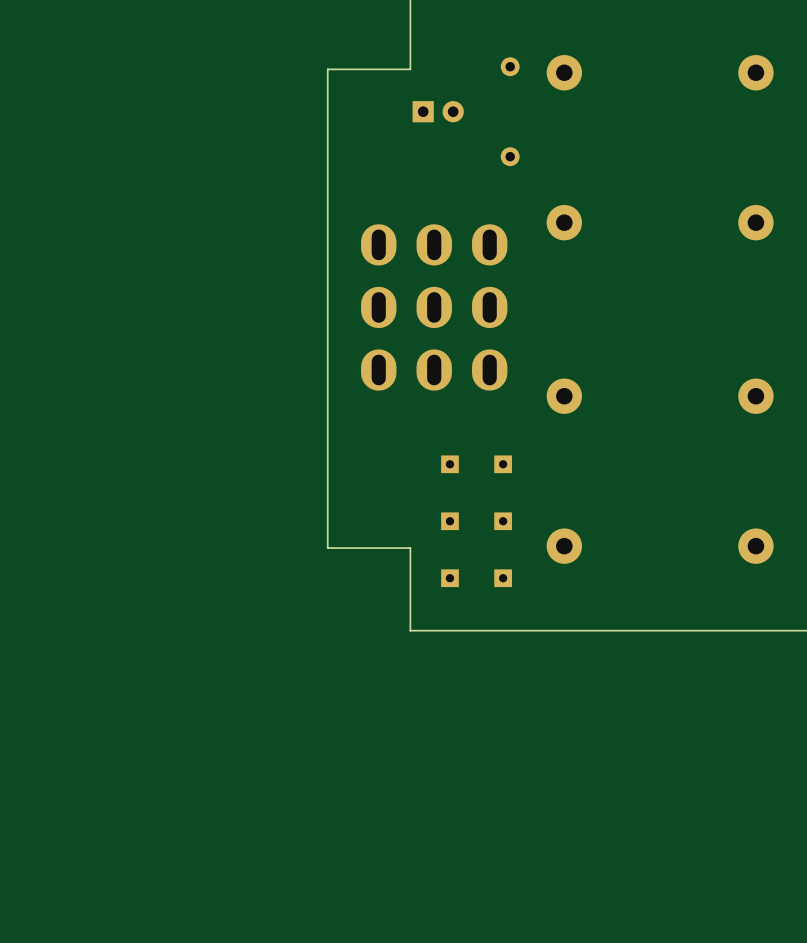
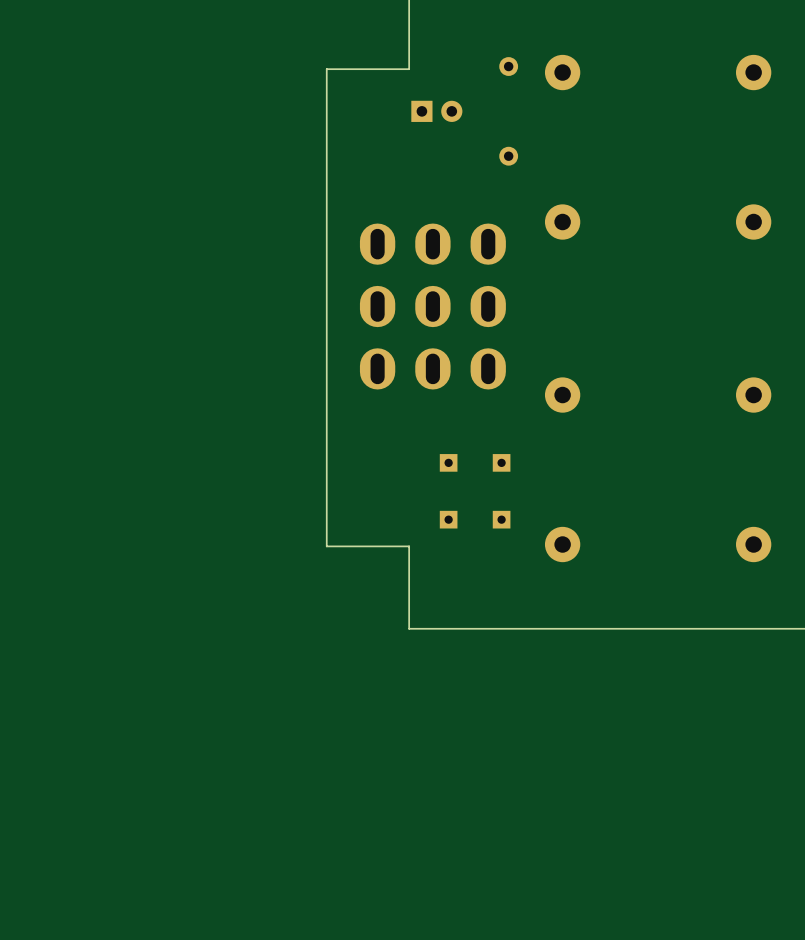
part: (449, 578) -> none
part: (503, 578) -> none

